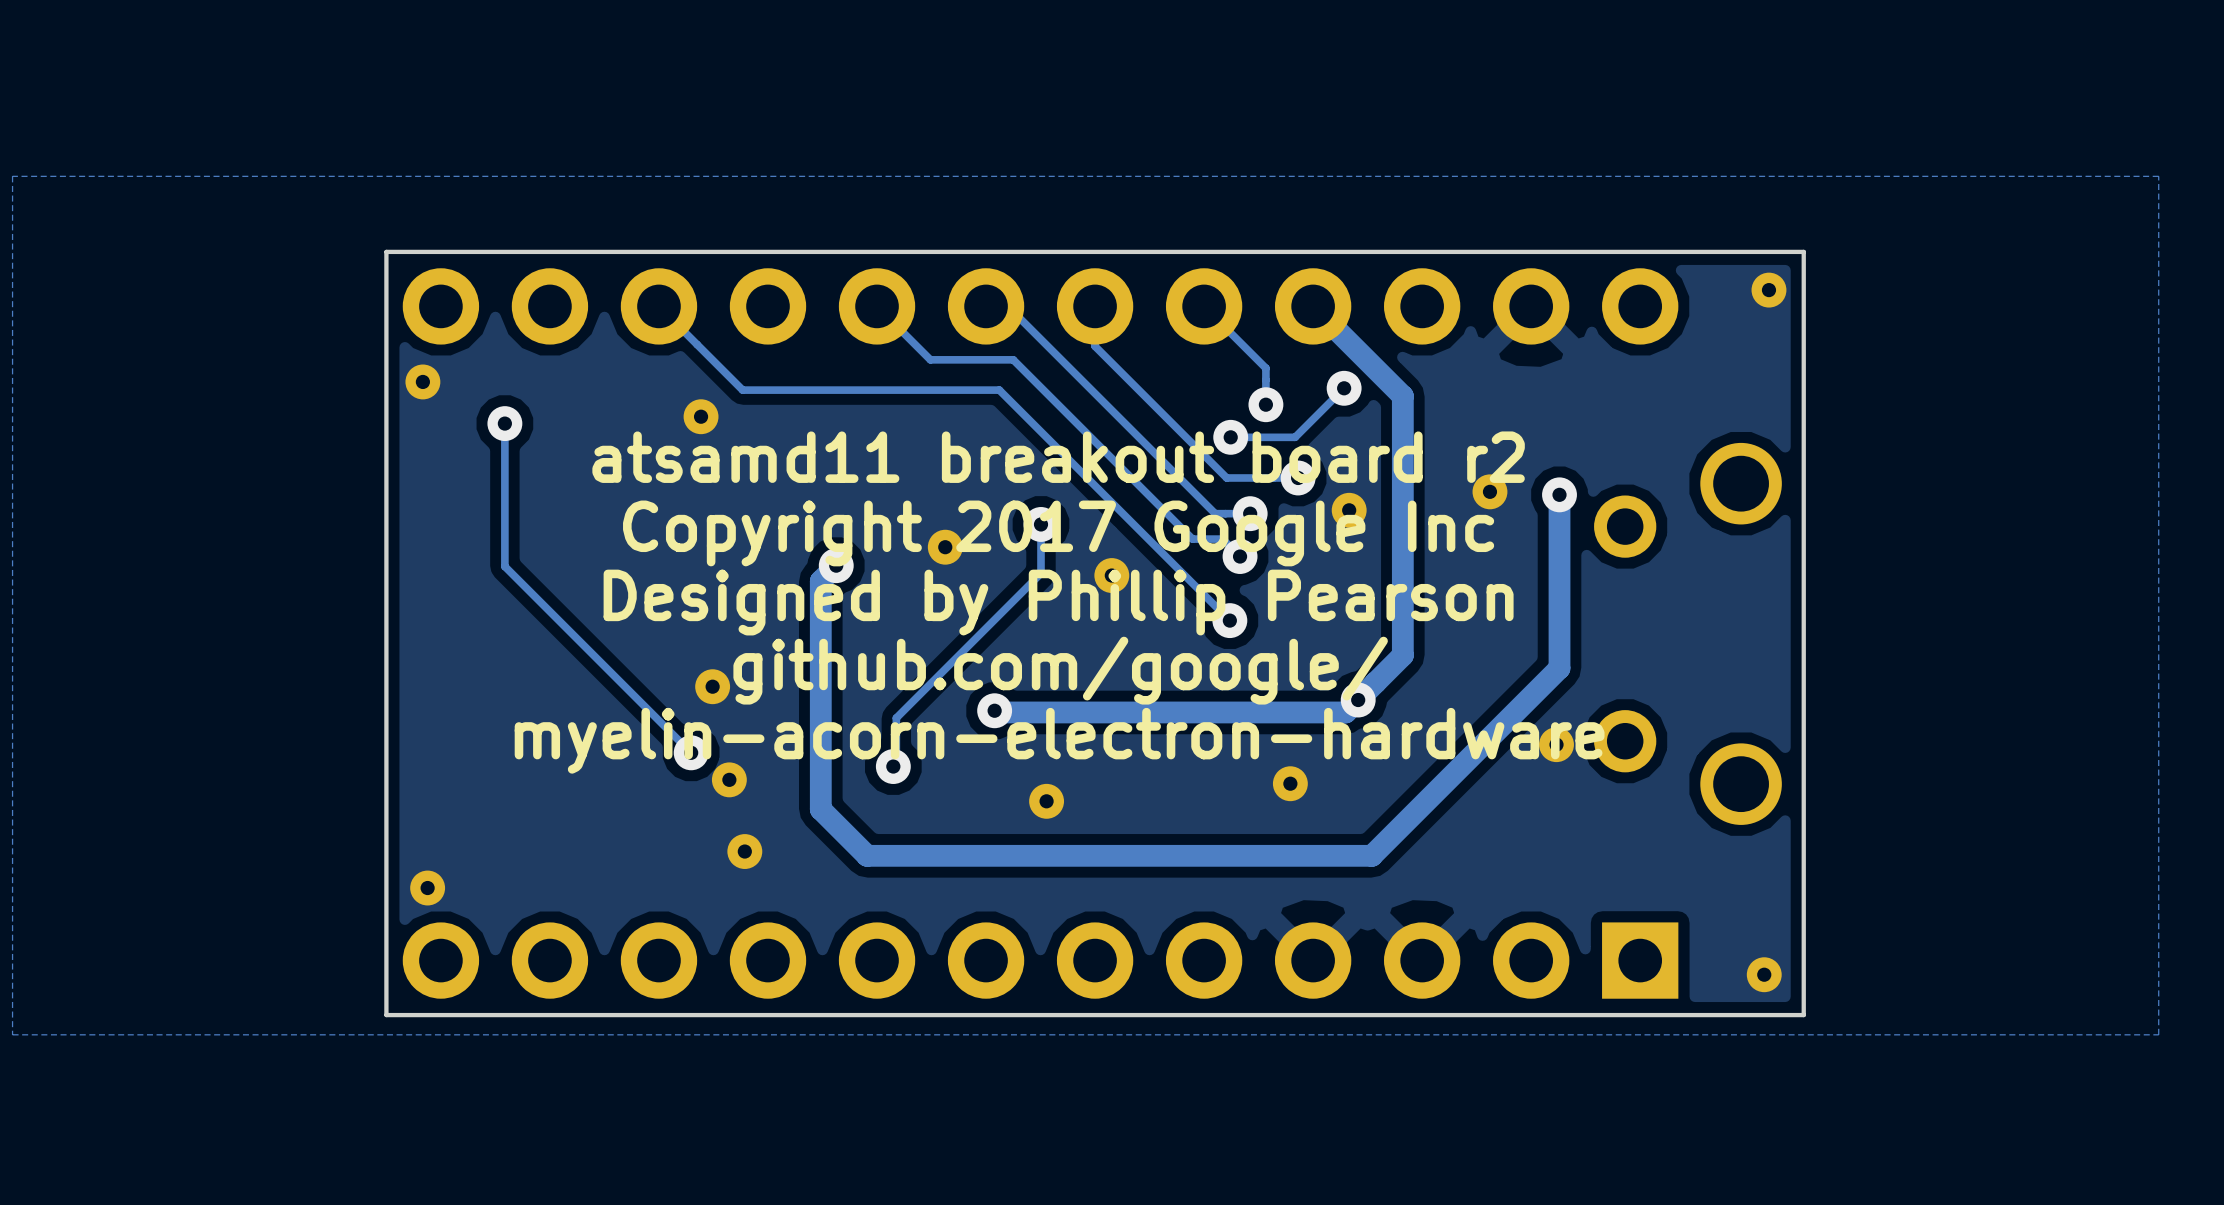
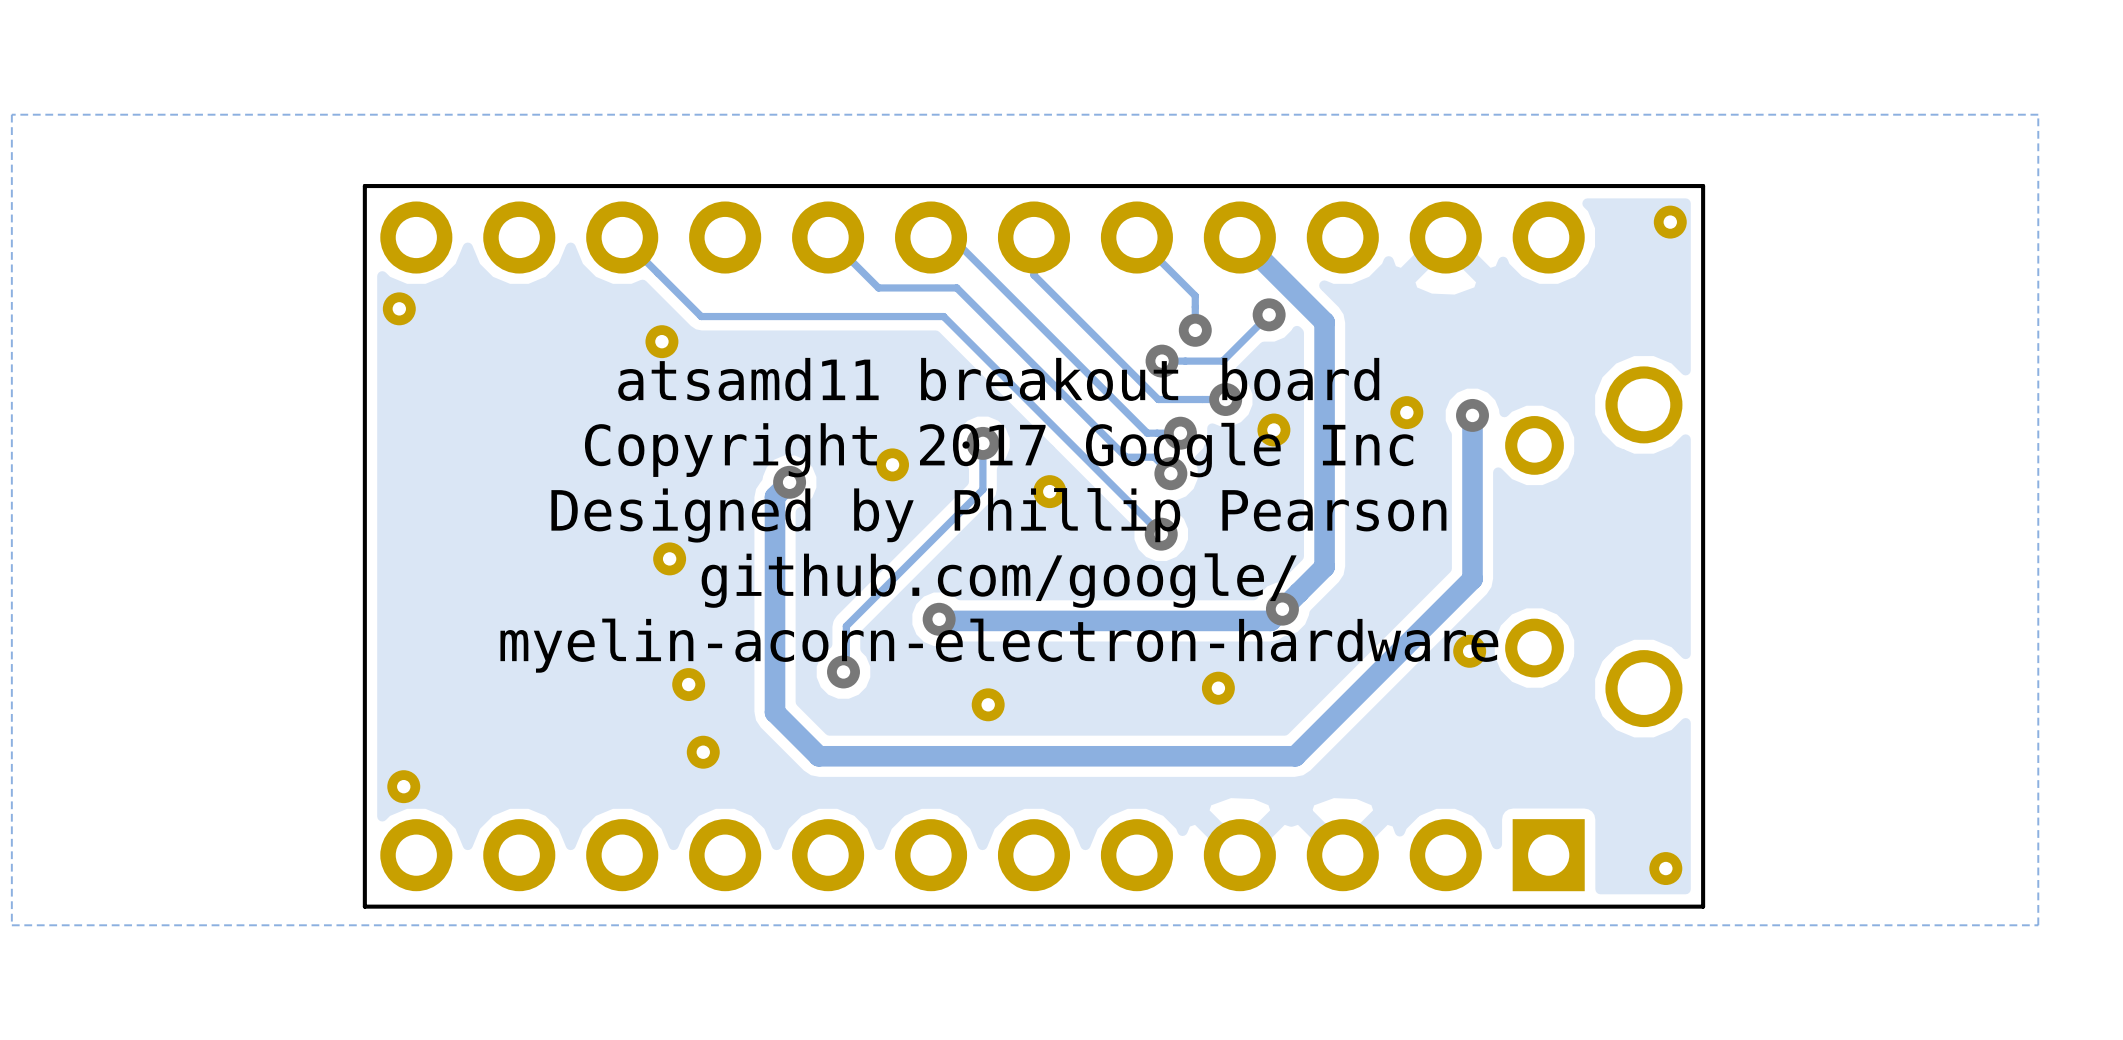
track: (504, 423) (504, 566) (691, 752) -> none
via: (504, 423) -> none
text: atsamd11 breakout board r2 (1058, 457) -> atsamd11 breakout board (998, 379)
part position: (712, 686) -> (669, 558)
via: (691, 752) -> none

